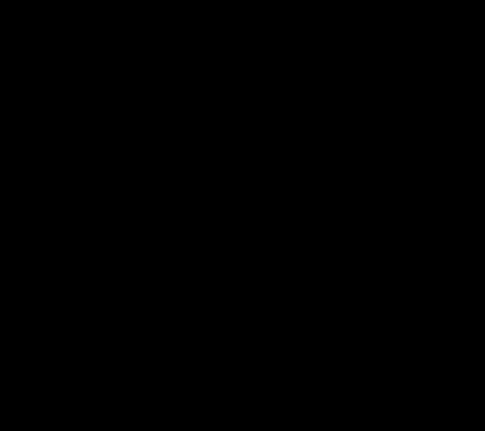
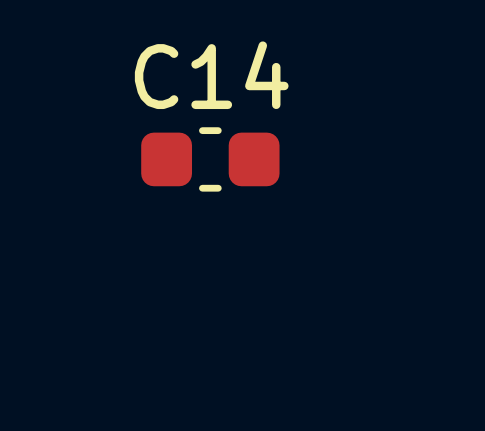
C14: none -> (210, 159)

